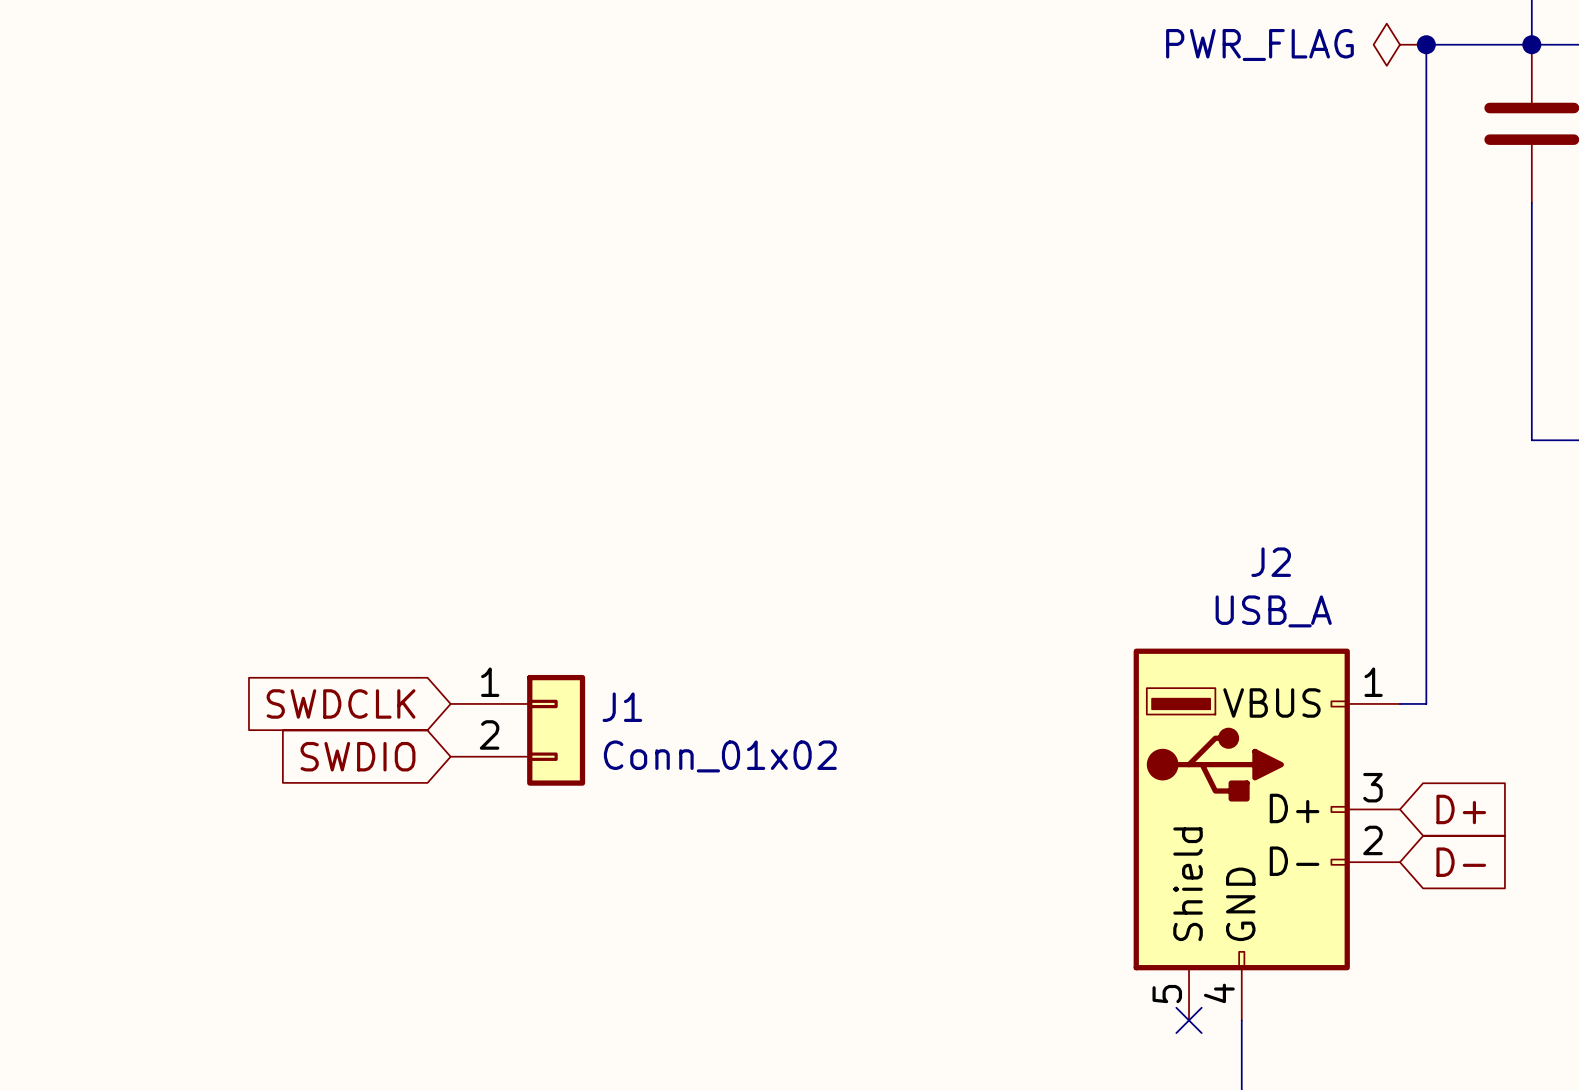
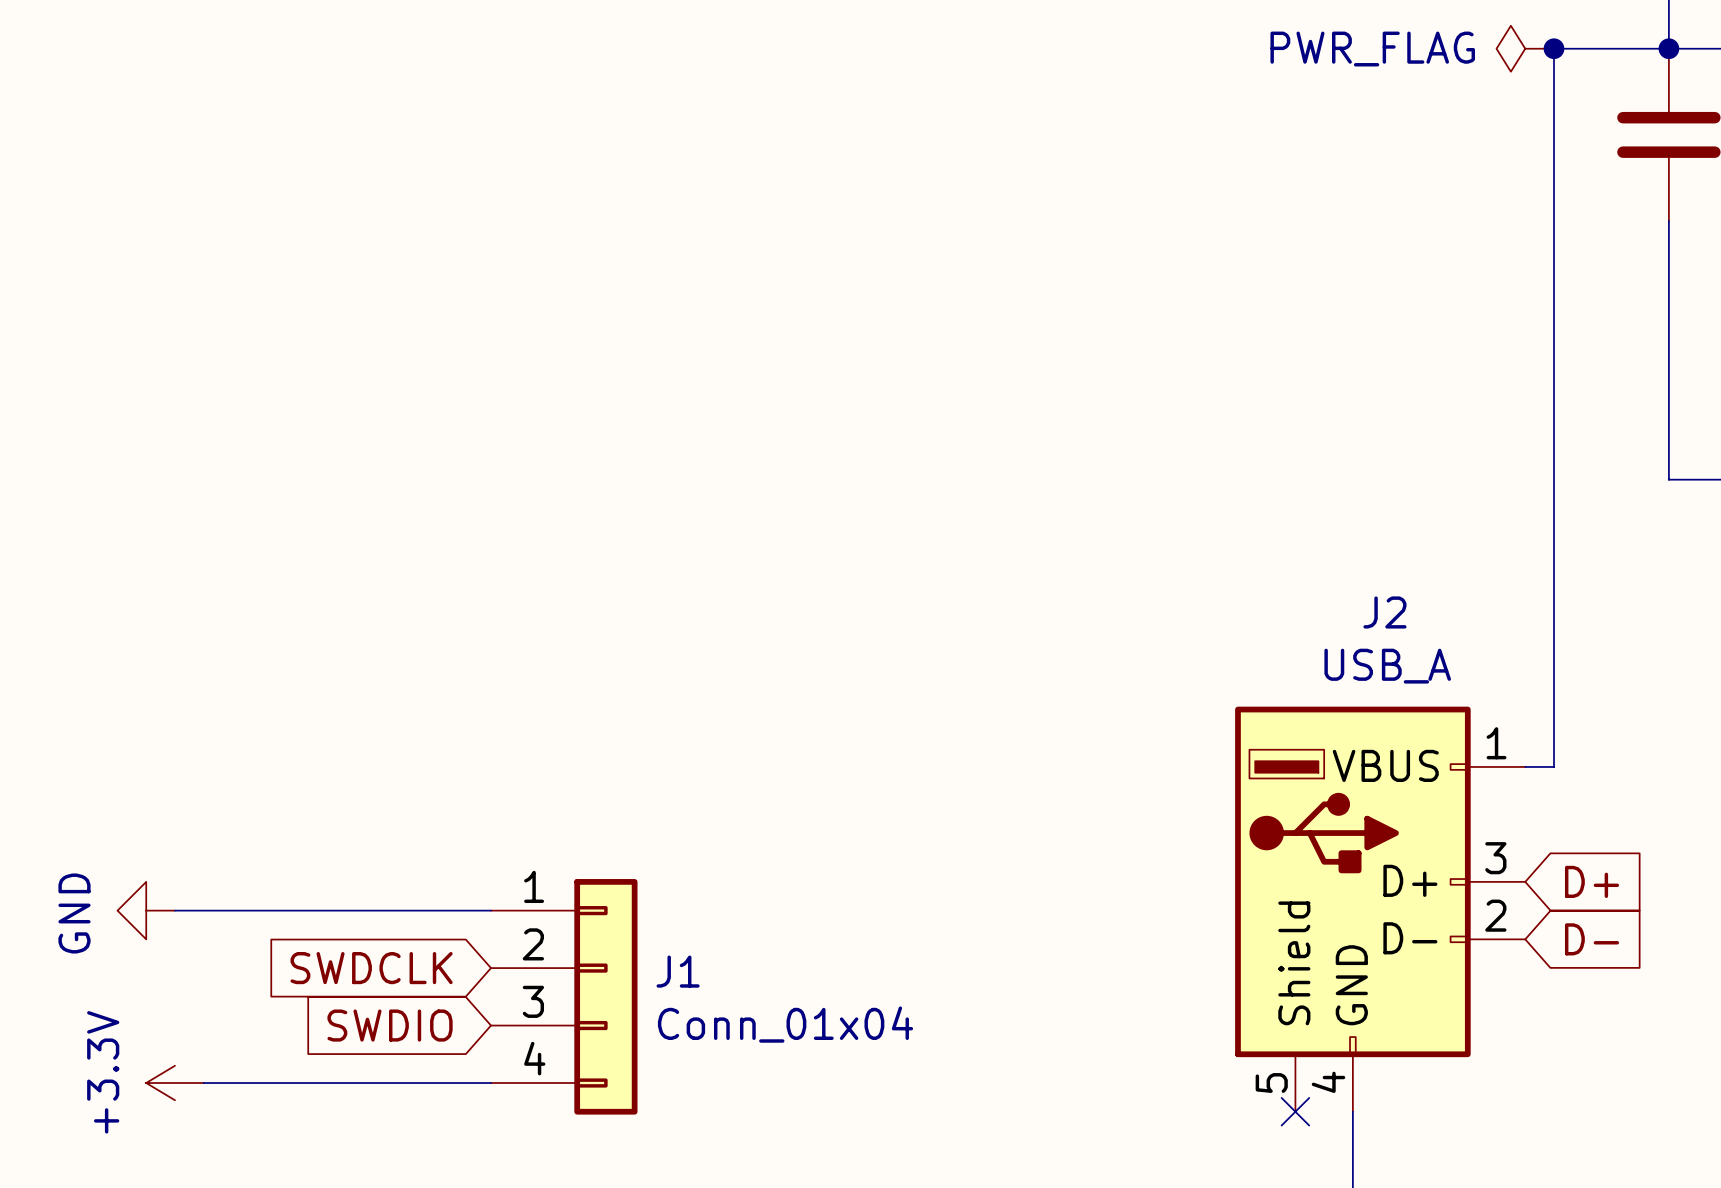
J1 symbol: [450, 674, 586, 786] -> [490, 879, 638, 1115]
global label position: SWDCLK (341, 703) -> SWDCLK (371, 968)
global label position: SWDIO (358, 756) -> SWDIO (390, 1025)
J1 value: Conn_01x02 (720, 756) -> Conn_01x04 (785, 1024)
power symbol: none -> GND (146, 910)
wire: none -> (174, 910) (490, 910)
power symbol: none -> +3.3V (174, 1083)
wire: none -> (203, 1083) (490, 1083)

